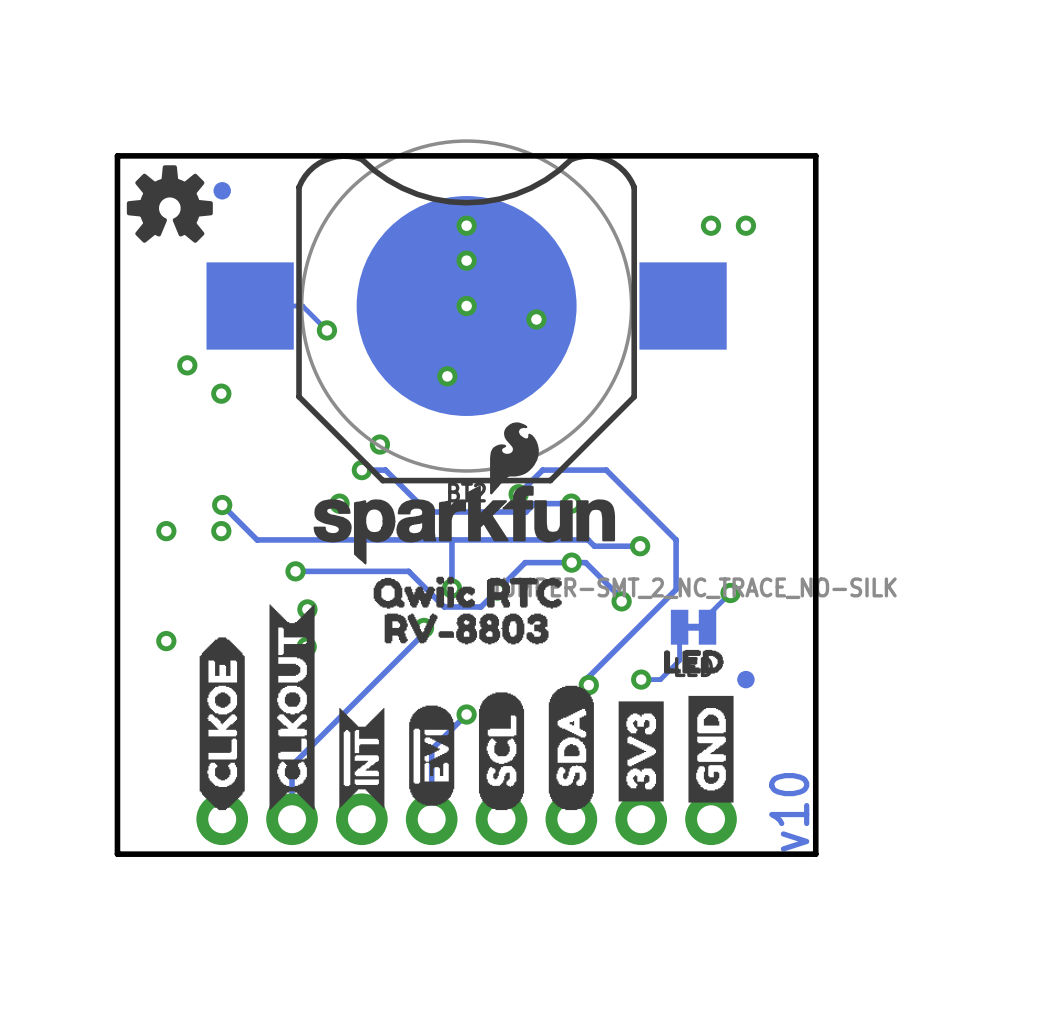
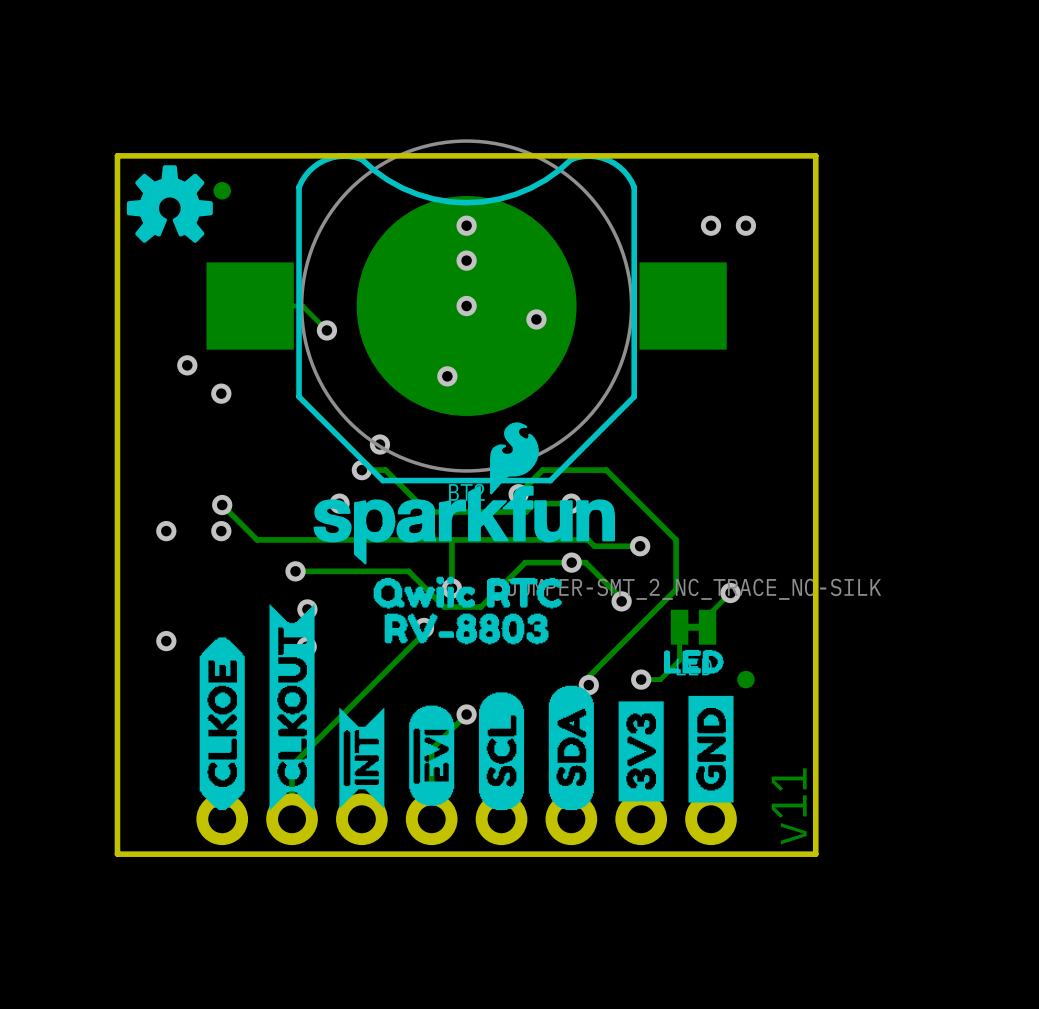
text: v10 (789, 812) -> v11 (789, 806)

